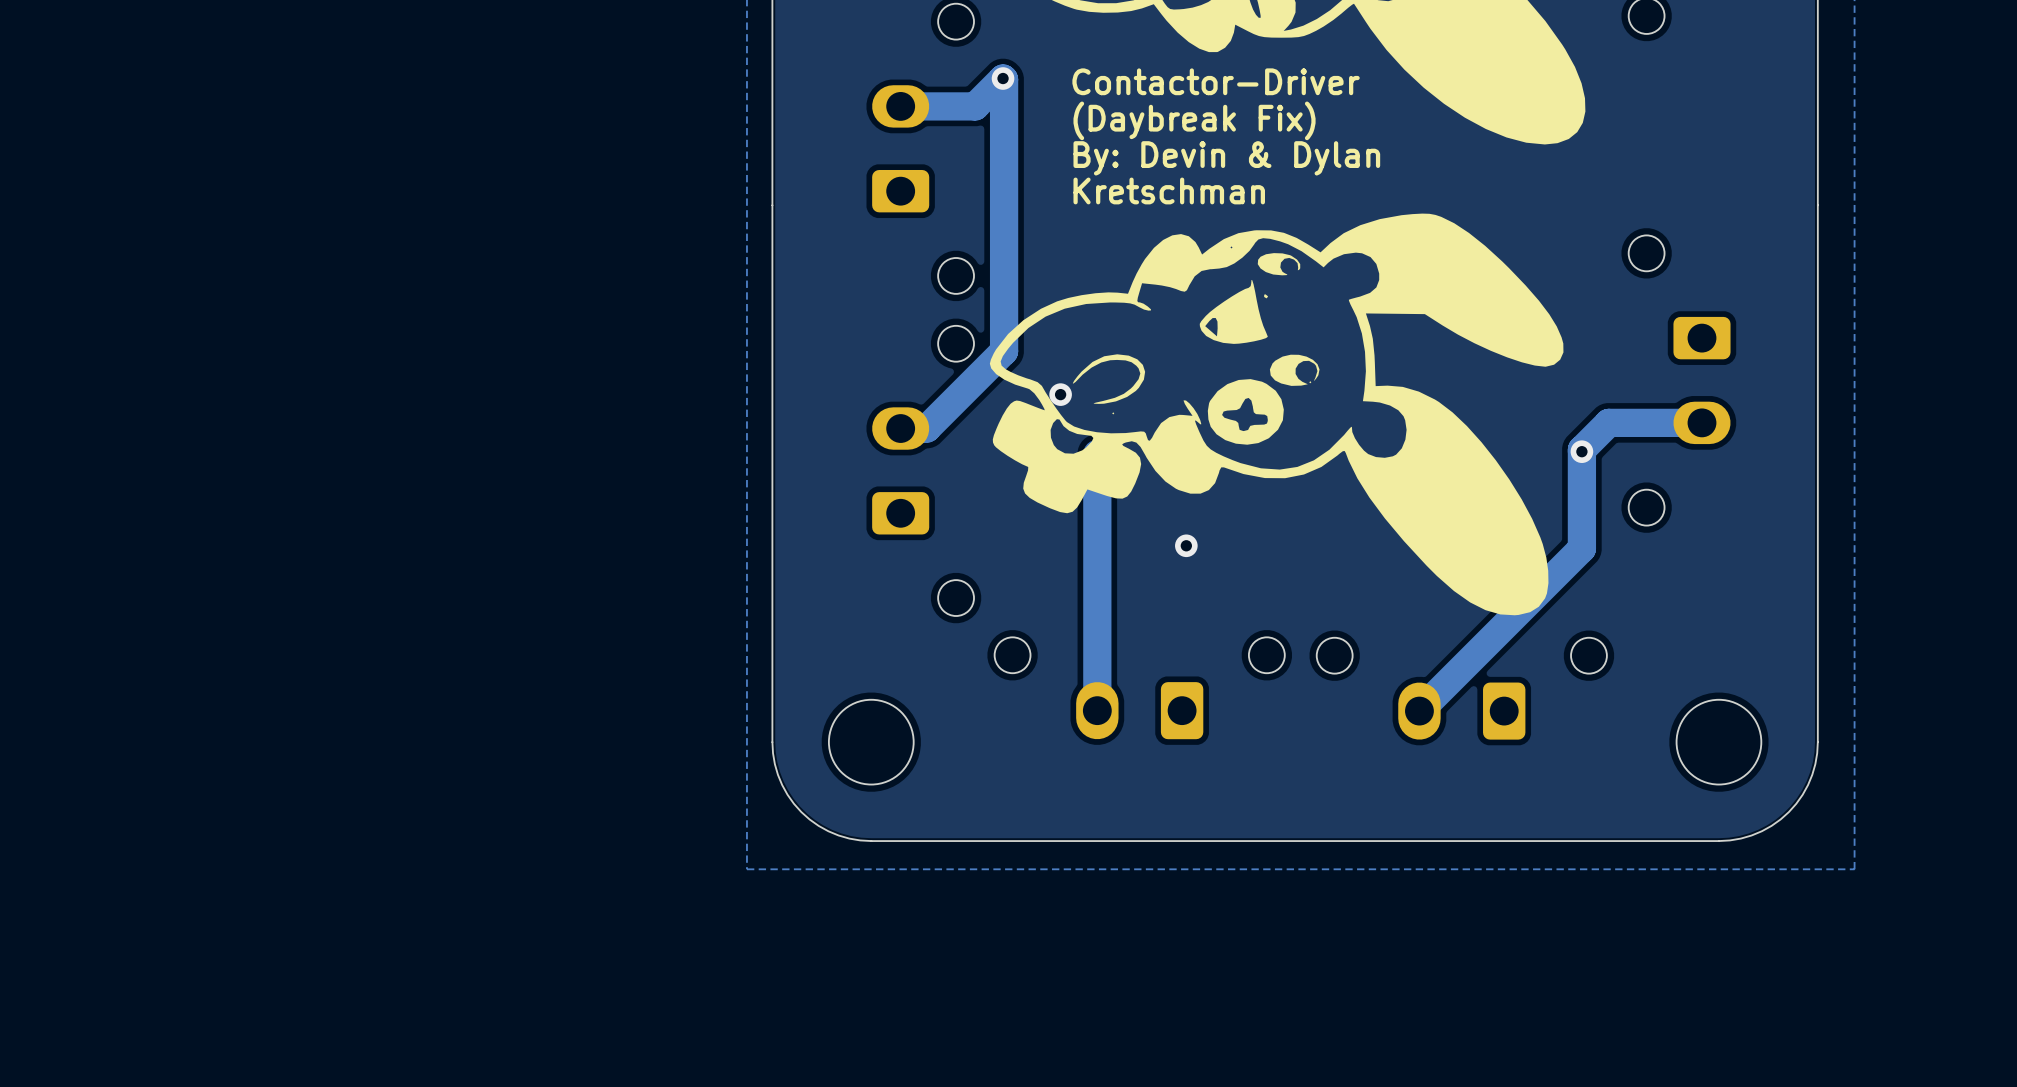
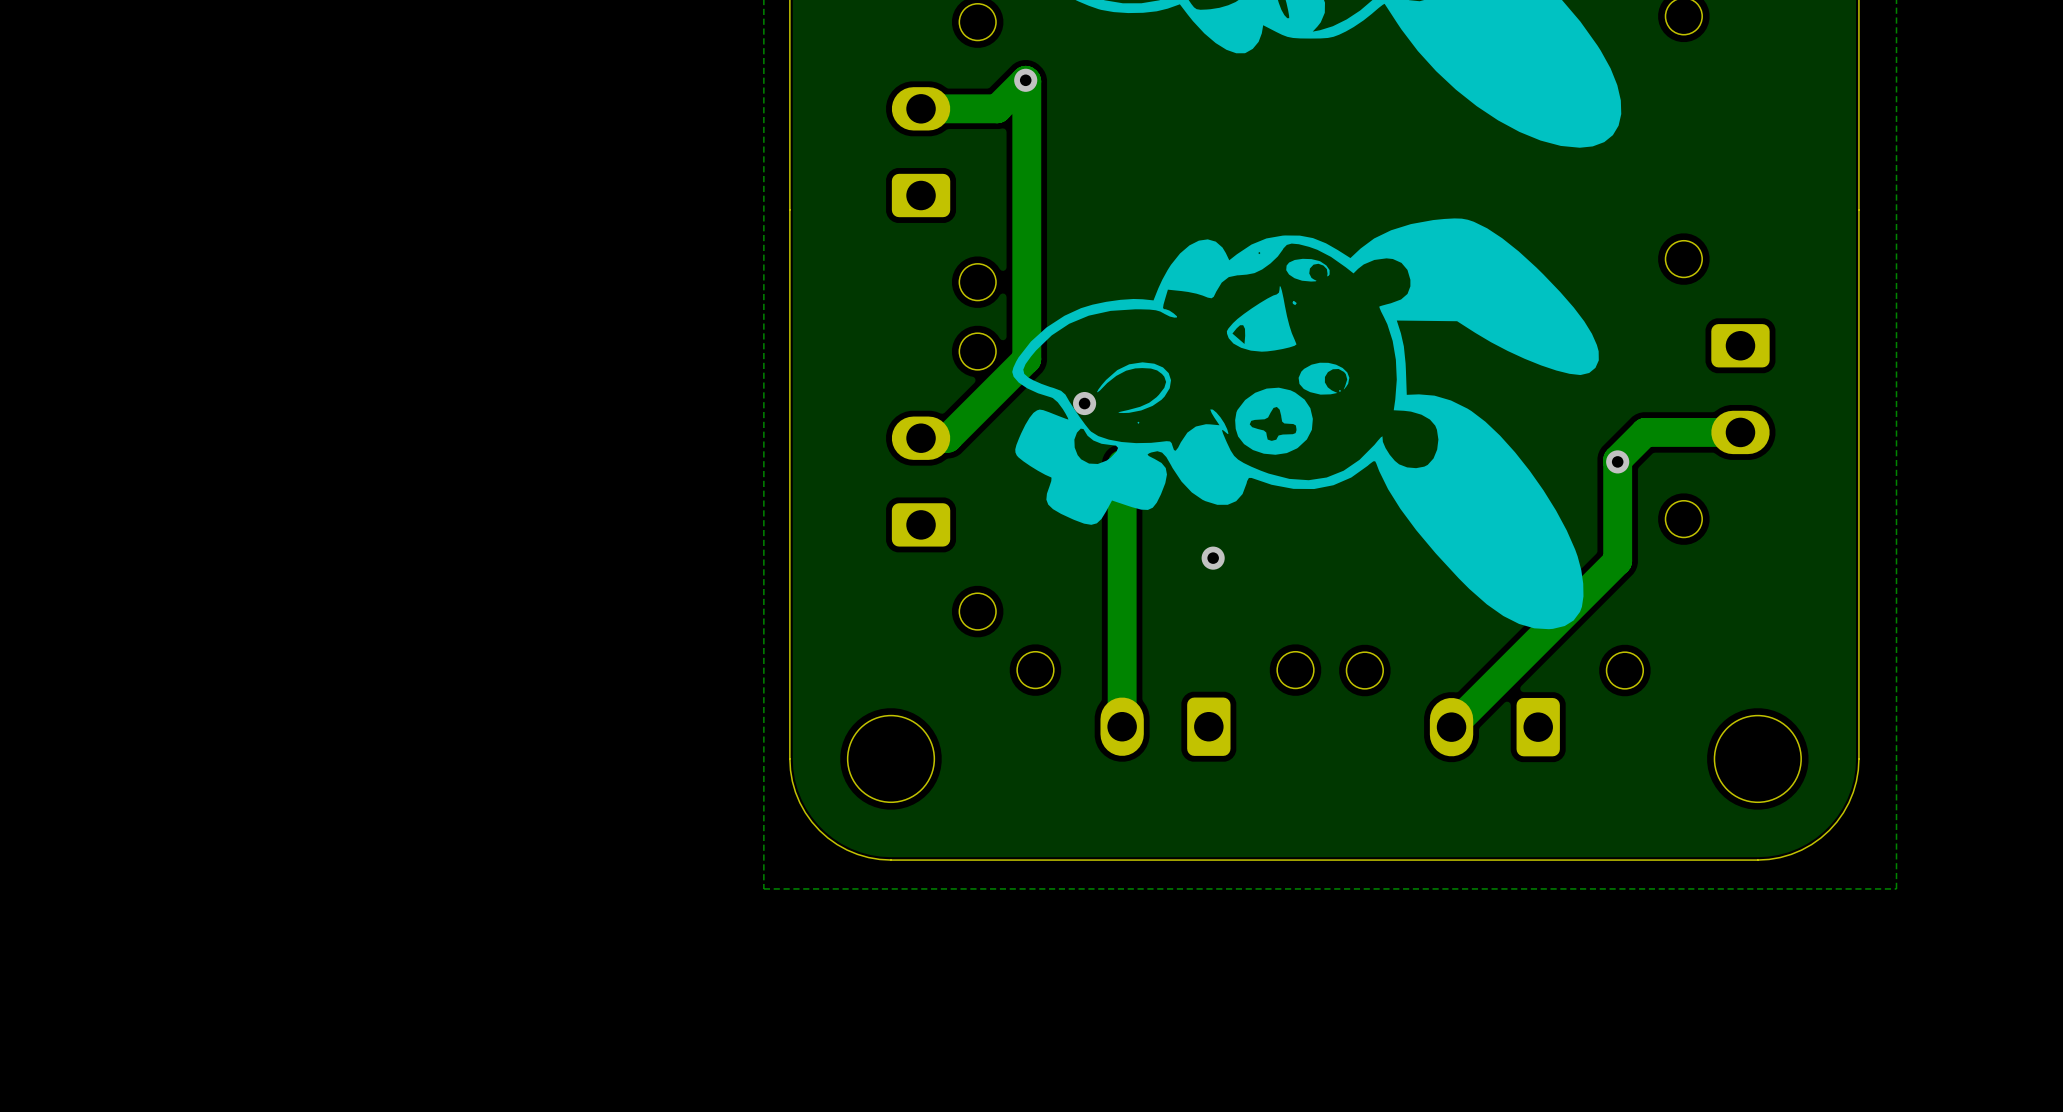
text: Contactor-Driver (1216, 81) -> none
text: (Daybreak Fix) (1194, 120) -> none
text: By: Devin & Dylan (1226, 158) -> none
text: Kretschman (1169, 190) -> none

